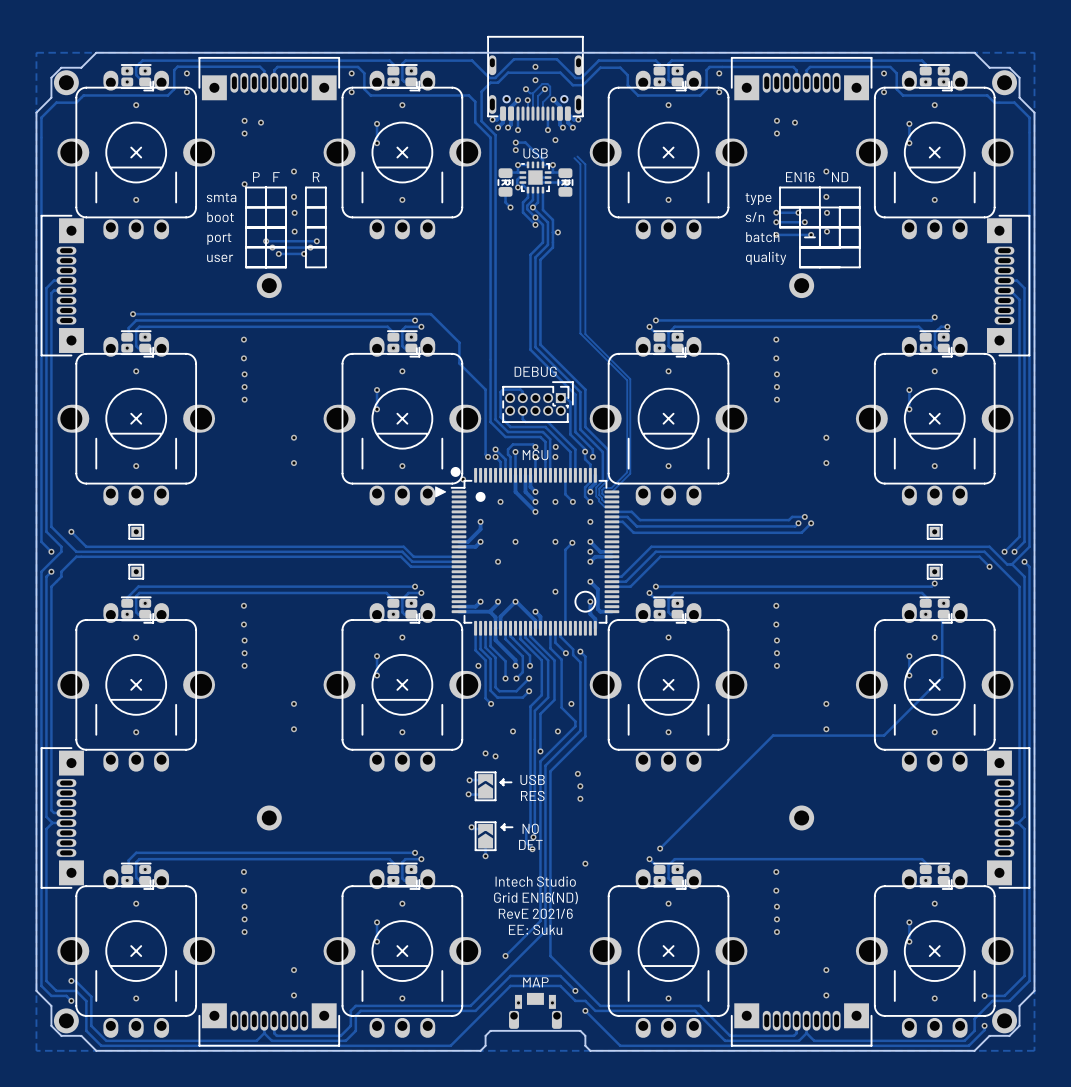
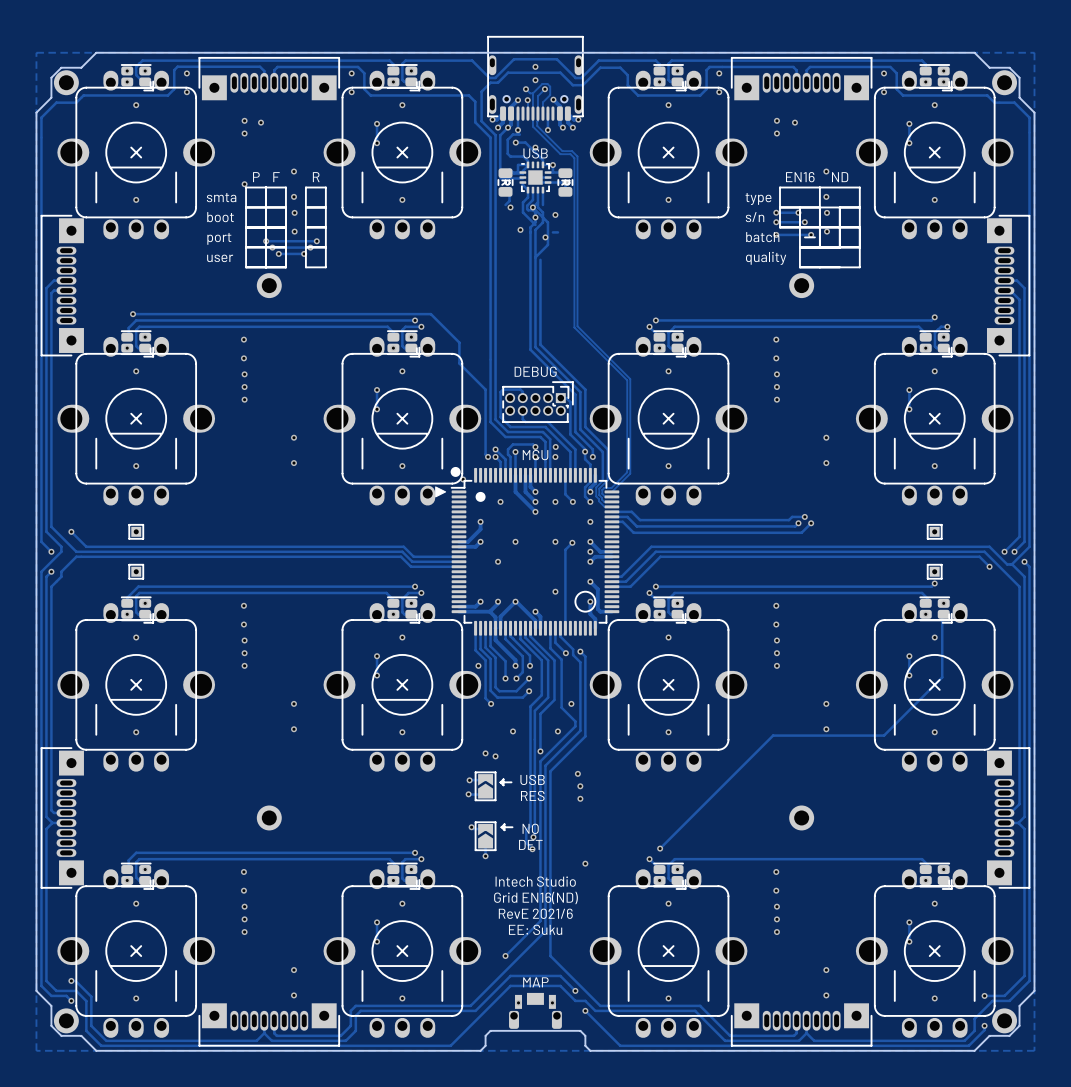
track: none -> (508, 127) (500, 135) (500, 177) (522, 178)
track: none -> (518, 130) (519, 134) (512, 134) (507, 139) (507, 153) (510, 156) (523, 156) (527, 161) (527, 165) (522, 173) (513, 173) (509, 169)
via: (555, 140) -> none
via: none -> (535, 147)
via: (515, 150) -> none
track: (577, 156) (585, 164) (585, 334) -> (537, 113) (537, 125) (562, 151) (572, 151) (577, 156) (577, 326) (585, 334)
track: (574, 158) (580, 164) (580, 333) -> (532, 113) (532, 126) (560, 154) (570, 154) (574, 158) (574, 327) (580, 333)
via: (518, 165) -> none
track: (522, 177) (517, 179) (518, 187) -> none
track: none -> (509, 187) (509, 200) (505, 204)
via: (518, 187) -> none
track: (505, 191) (505, 202) (510, 207) -> none
track: none -> (537, 202) (537, 207) (542, 212) (542, 222) (535, 229) (535, 257)
track: (542, 204) (542, 209) (552, 219) (552, 247) (540, 259) -> none
track: (528, 210) (542, 224) (542, 242) (530, 254) -> (528, 210) (535, 212) (535, 222) (530, 227) (530, 254)
via: none -> (555, 214)
via: (535, 224) -> none
via: none -> (520, 229)
via: (557, 232) -> none
via: none -> (545, 237)

